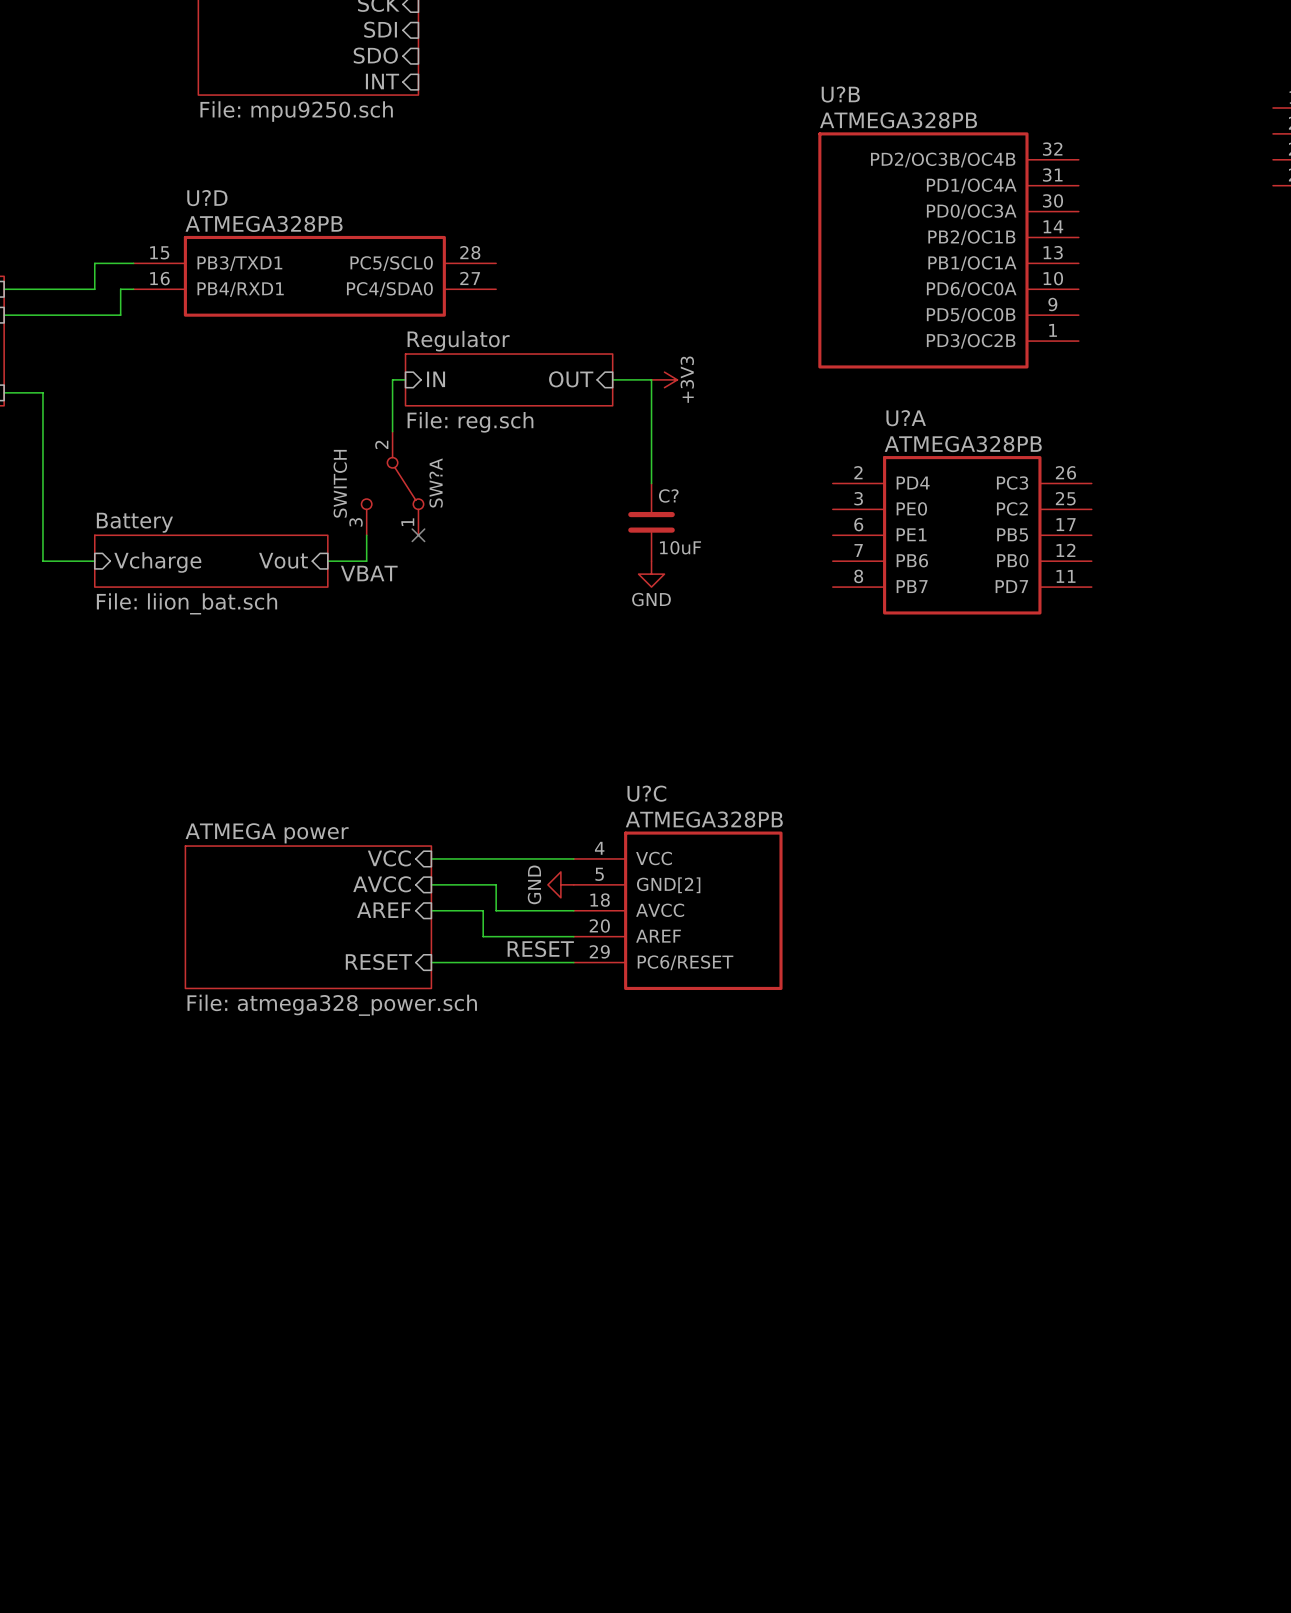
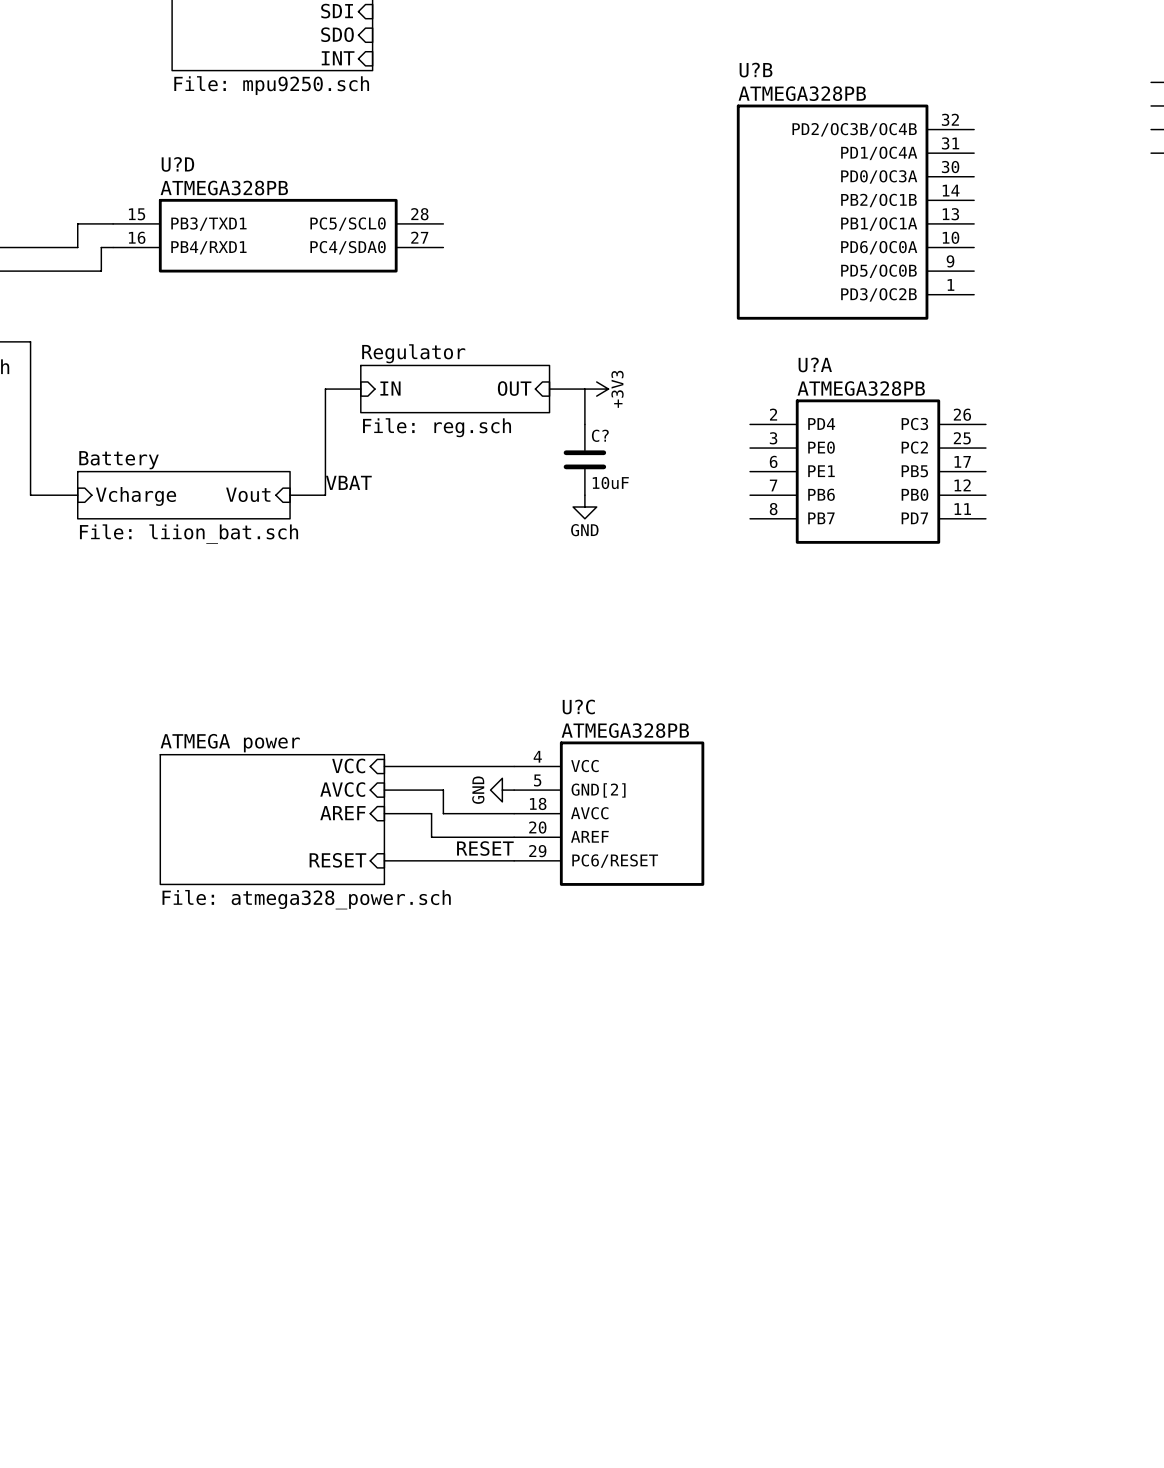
wire: (405, 379) (392, 379) (392, 431) -> none
sheet pin position: IN (436, 379) -> IN (390, 388)
sheet Regulator position: (509, 379) -> (455, 389)
sheet pin position: OUT (571, 379) -> OUT (514, 388)
wire: (612, 379) (651, 379) (651, 444) -> (549, 389) (584, 389)
power symbol position: +3V3 (664, 379) -> +3V3 (596, 389)
wire: none -> (360, 389) (325, 389) (325, 471)
SW?A: SWITCH (392, 483) -> none
no-connect mark: (418, 535) -> none
label position: VBAT (369, 573) -> VBAT (348, 482)

